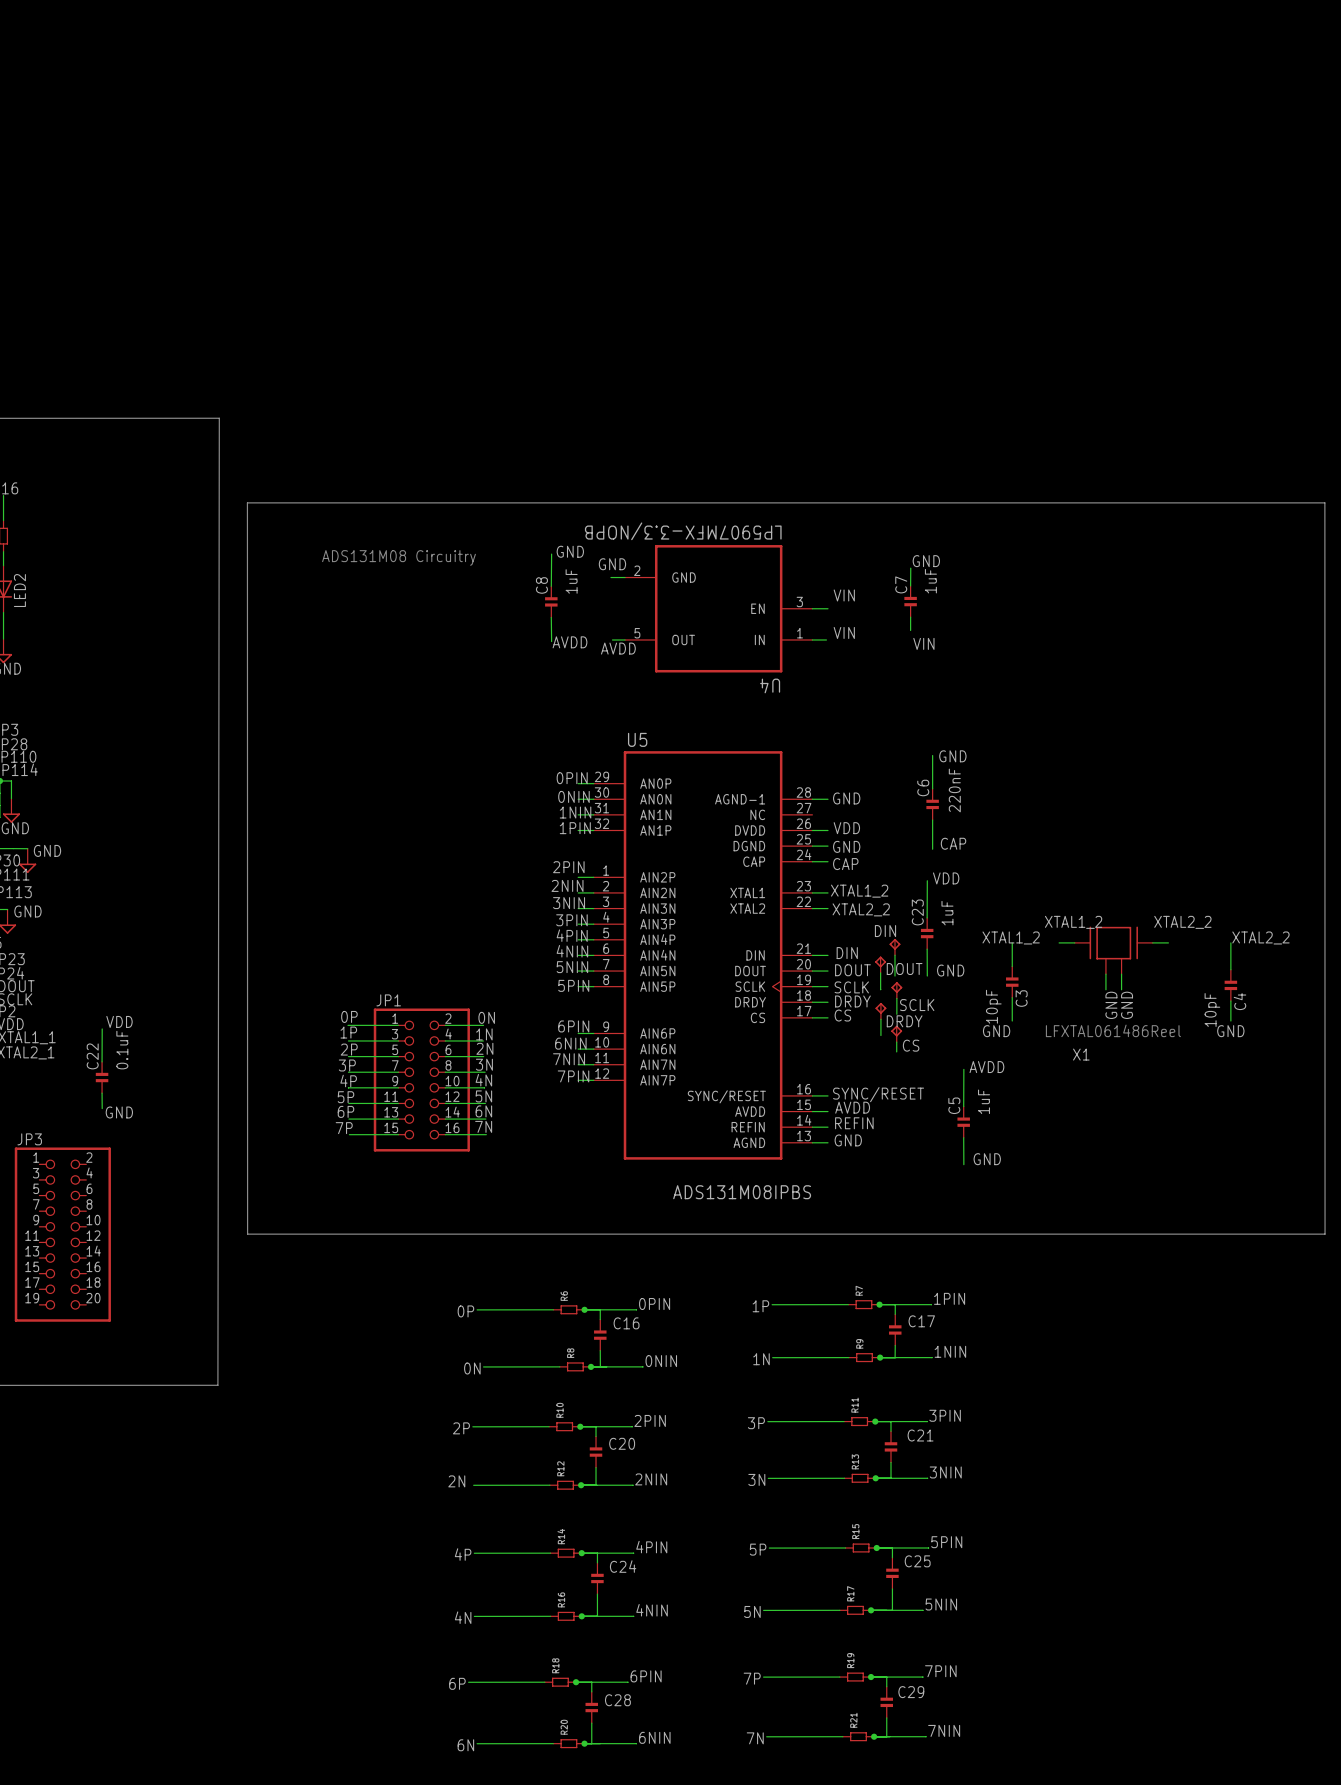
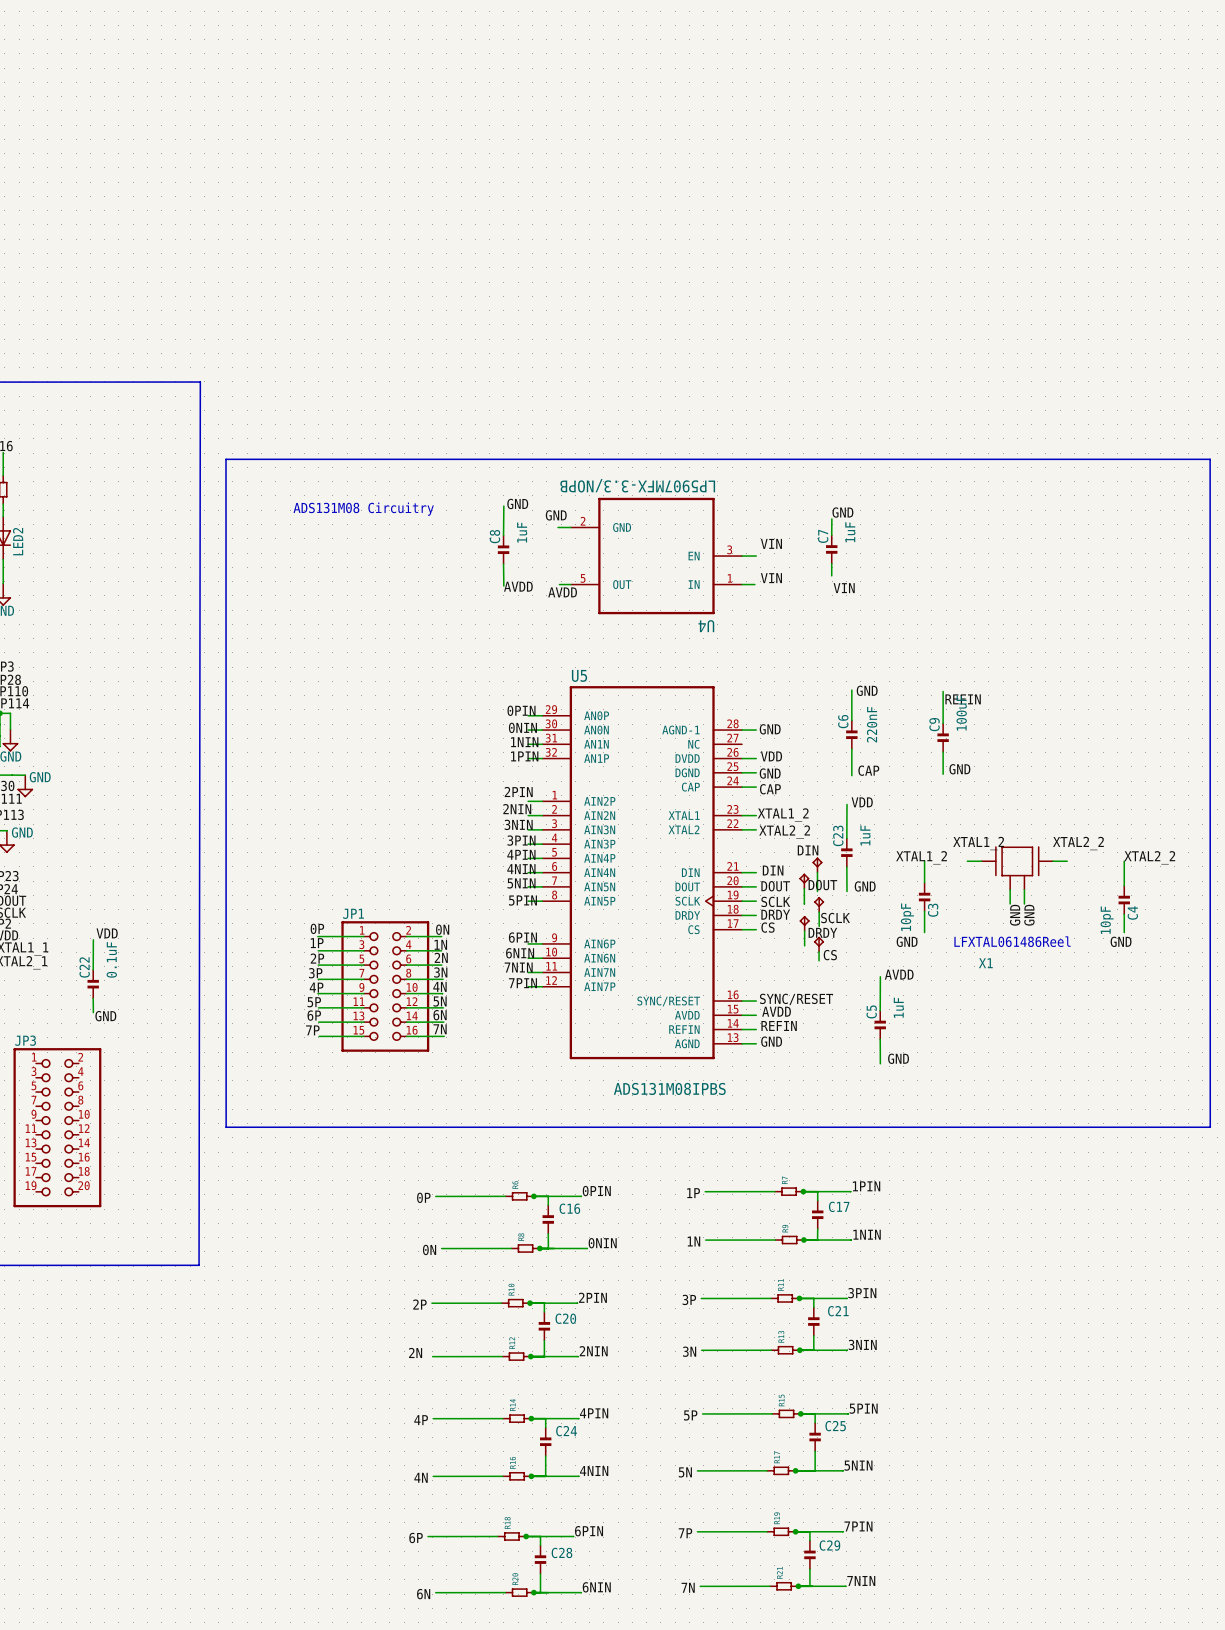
wire: none -> (943, 691) (943, 723)
label: none -> REFIN (963, 699)
C9: none -> 100uF (943, 737)
wire: none -> (943, 751) (943, 774)
label: none -> GND (959, 769)

